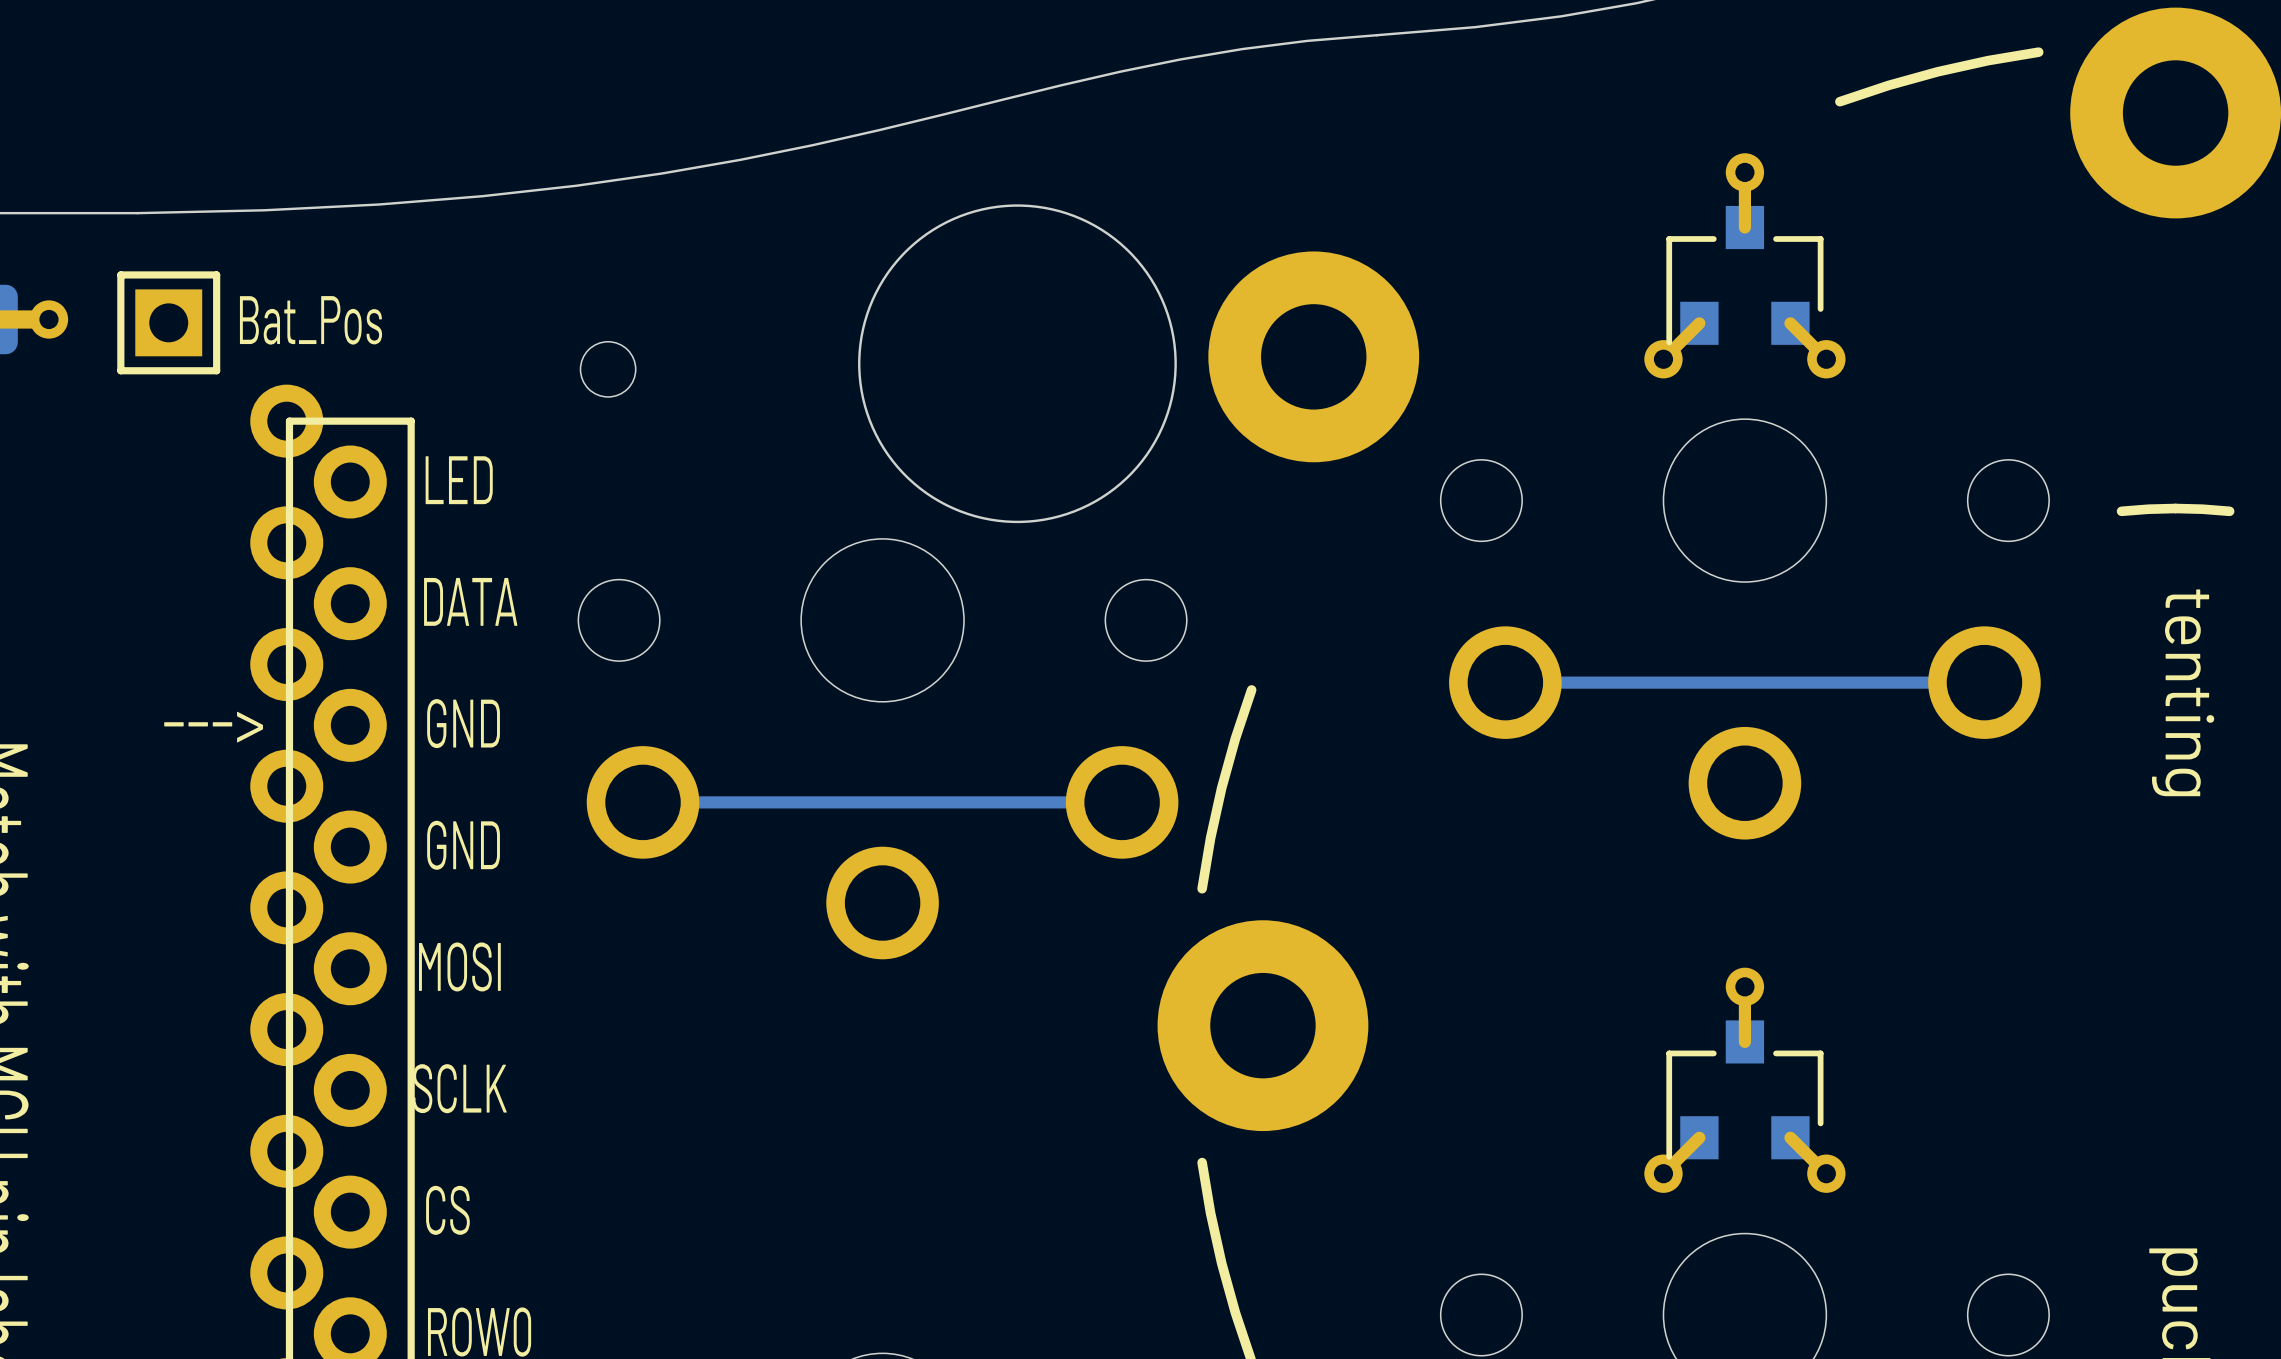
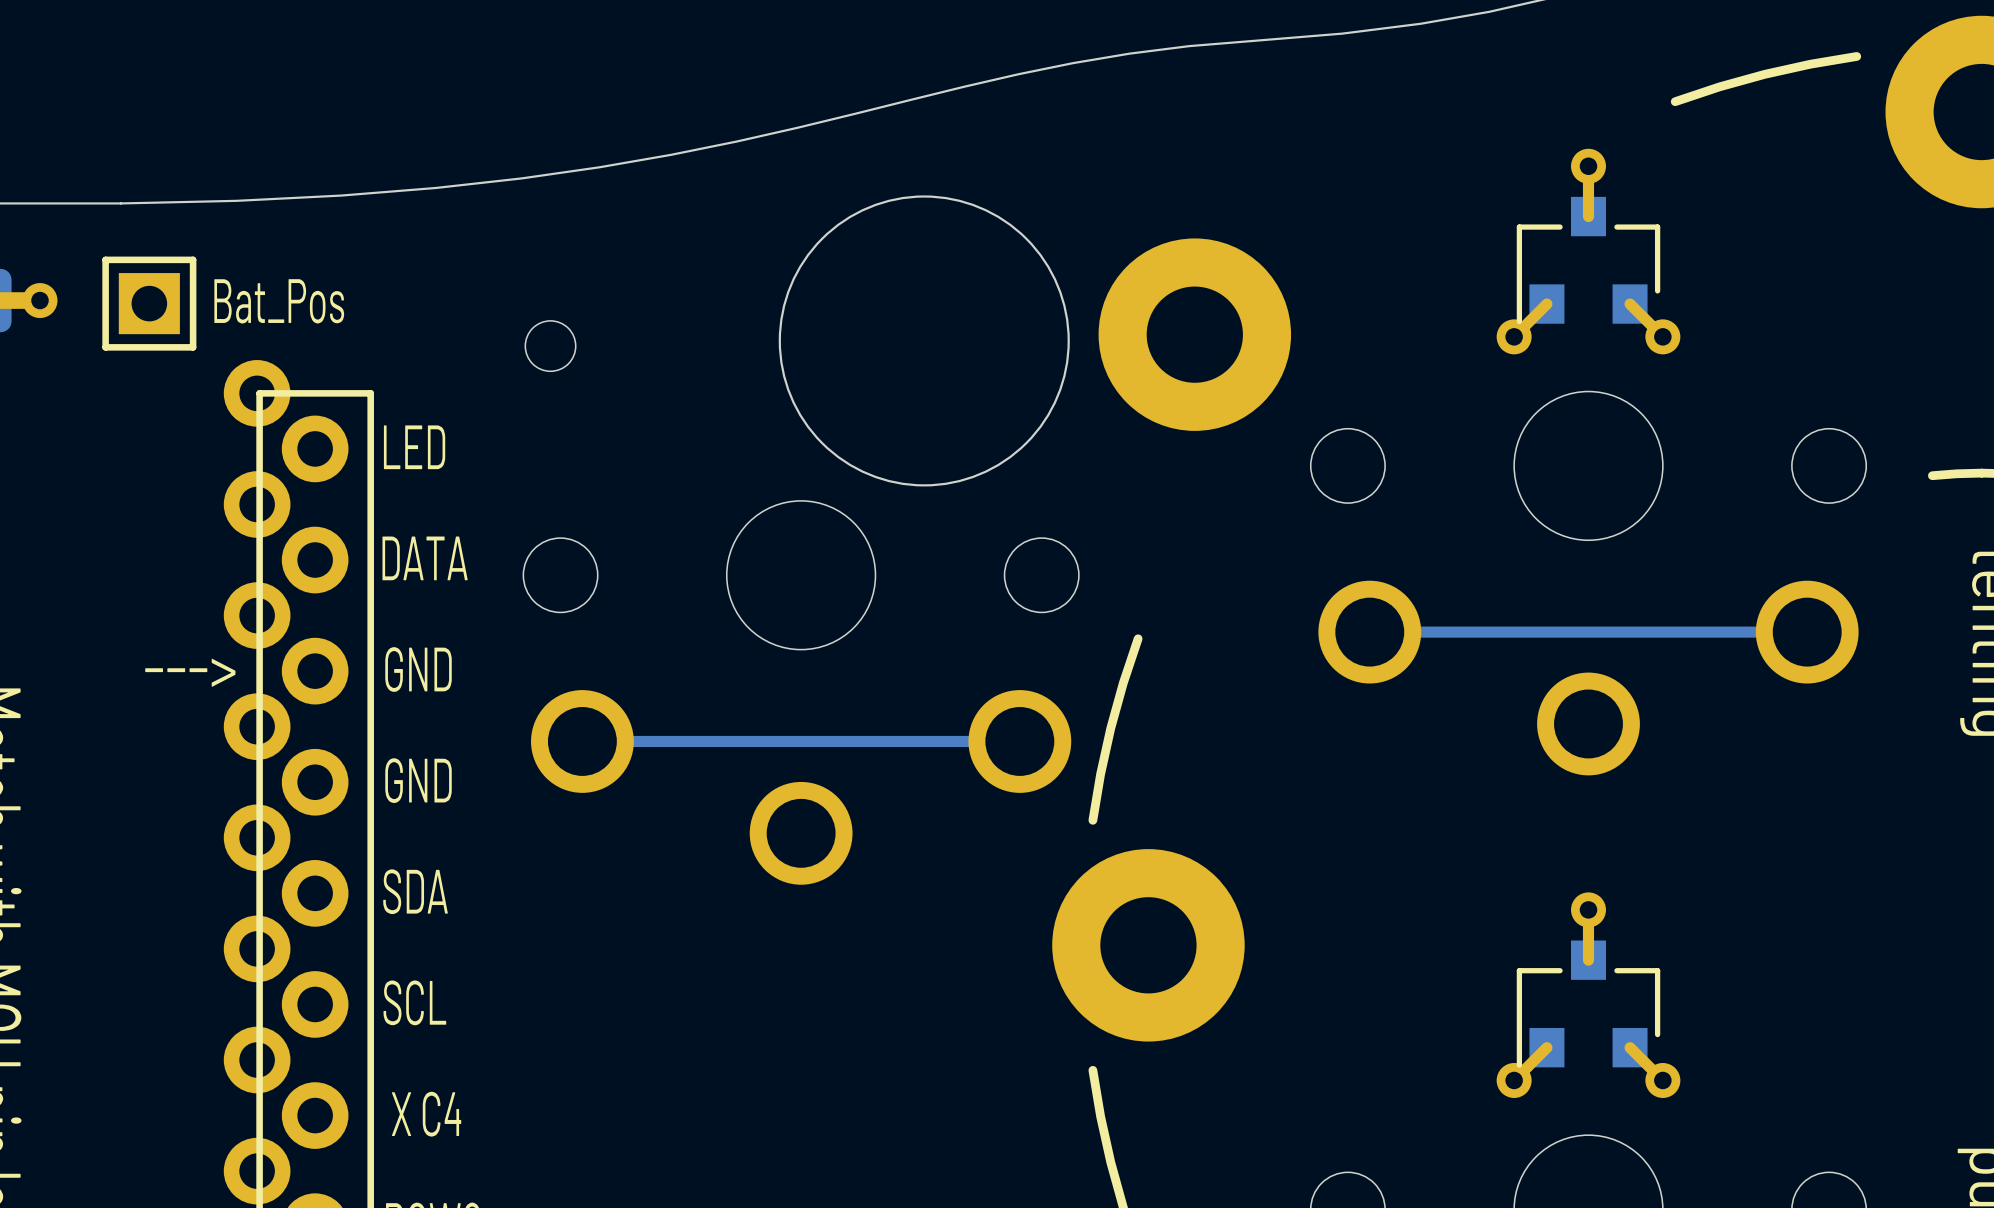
part text: MOSI (459, 966) -> SDA (415, 891)
part text: SCLK (459, 1088) -> SCL (414, 1002)
part text: CS (447, 1210) -> none
part text: none -> X C4 (426, 1114)

